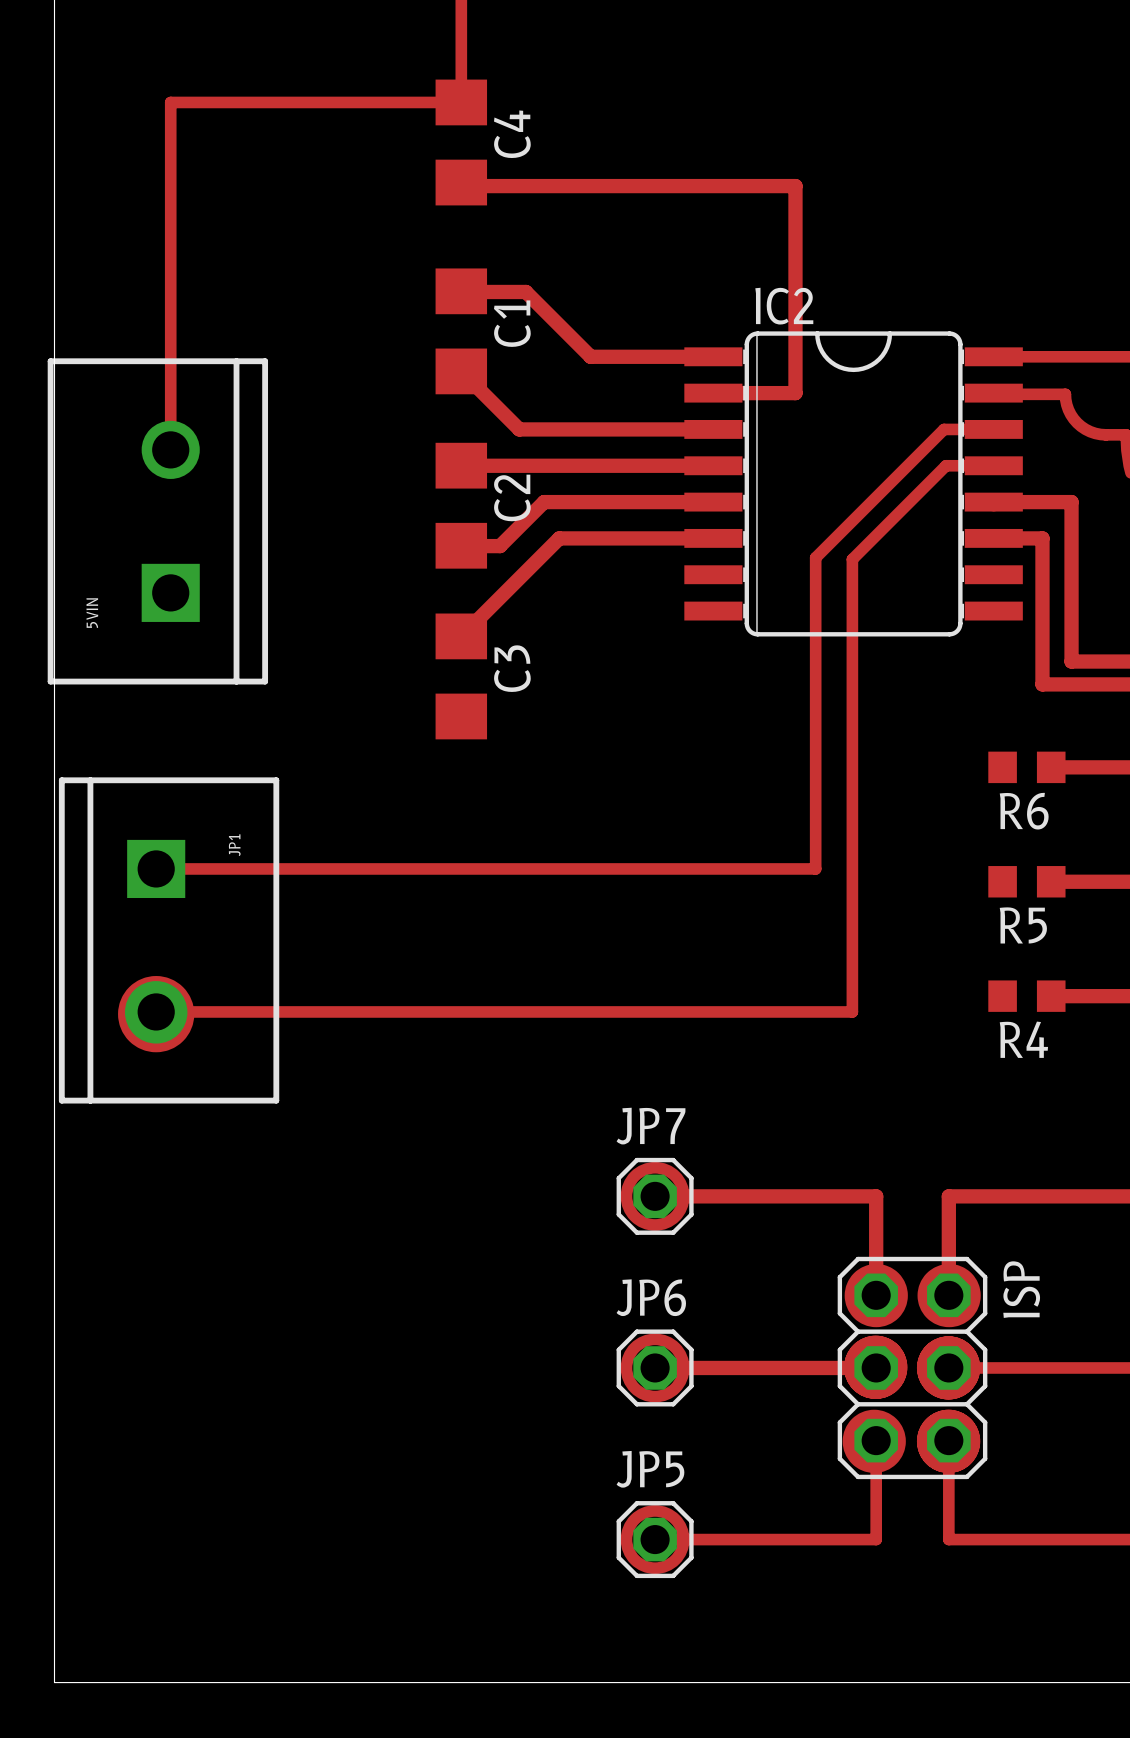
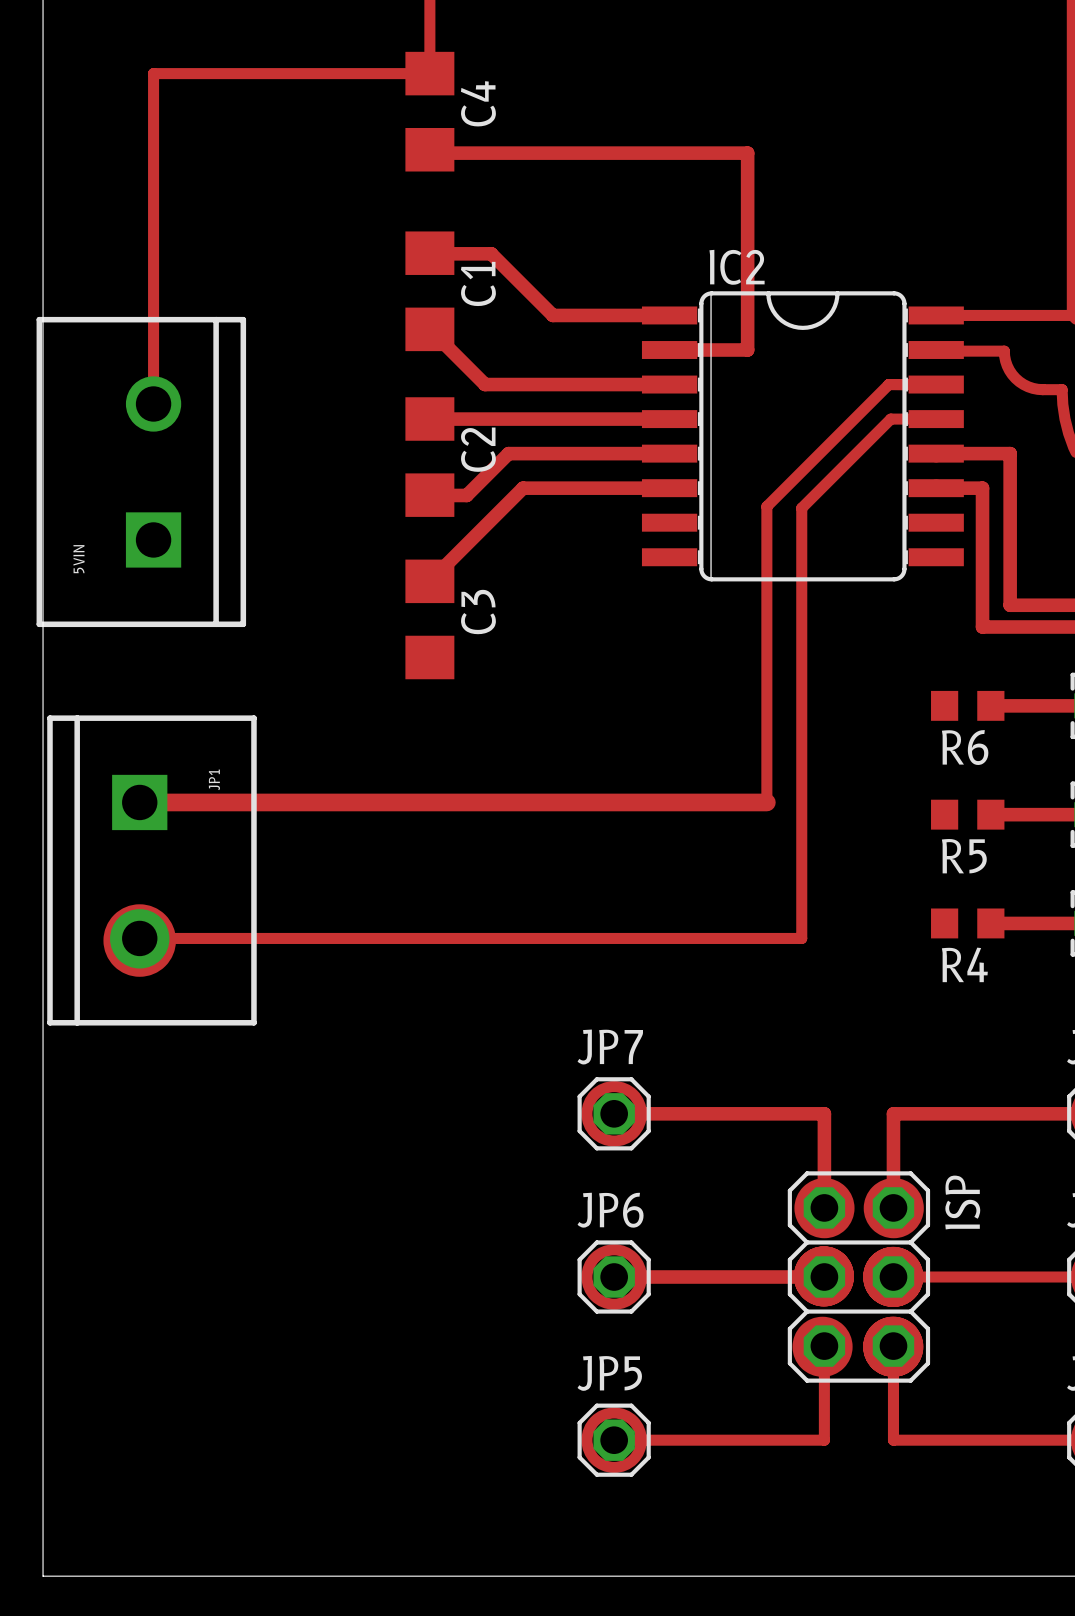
track width: thin (156, 868) (815, 868) -> thick (139, 802) (766, 802)

